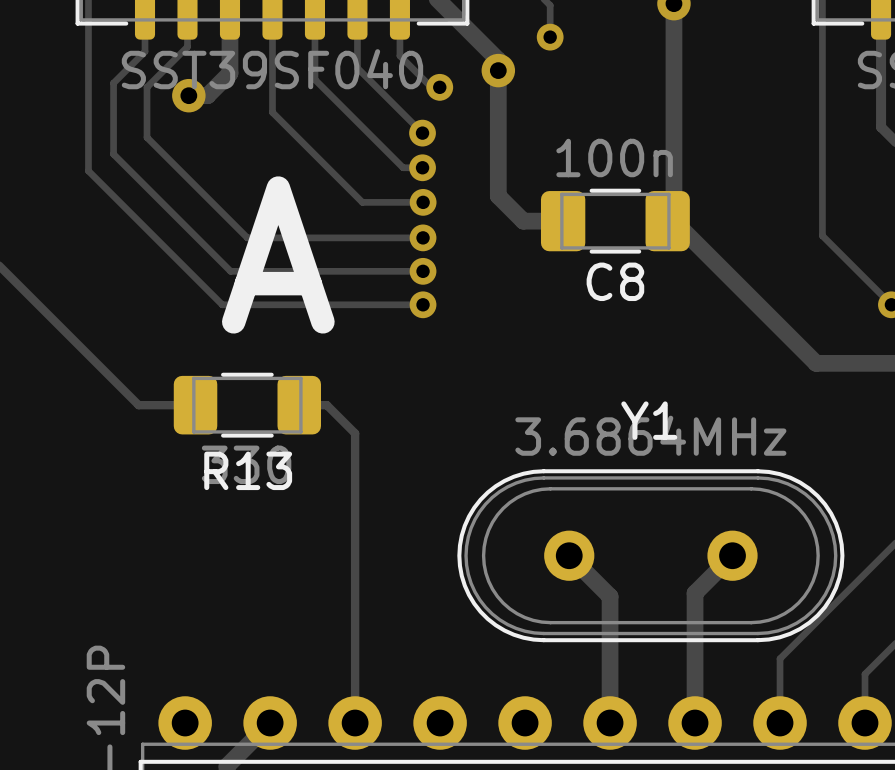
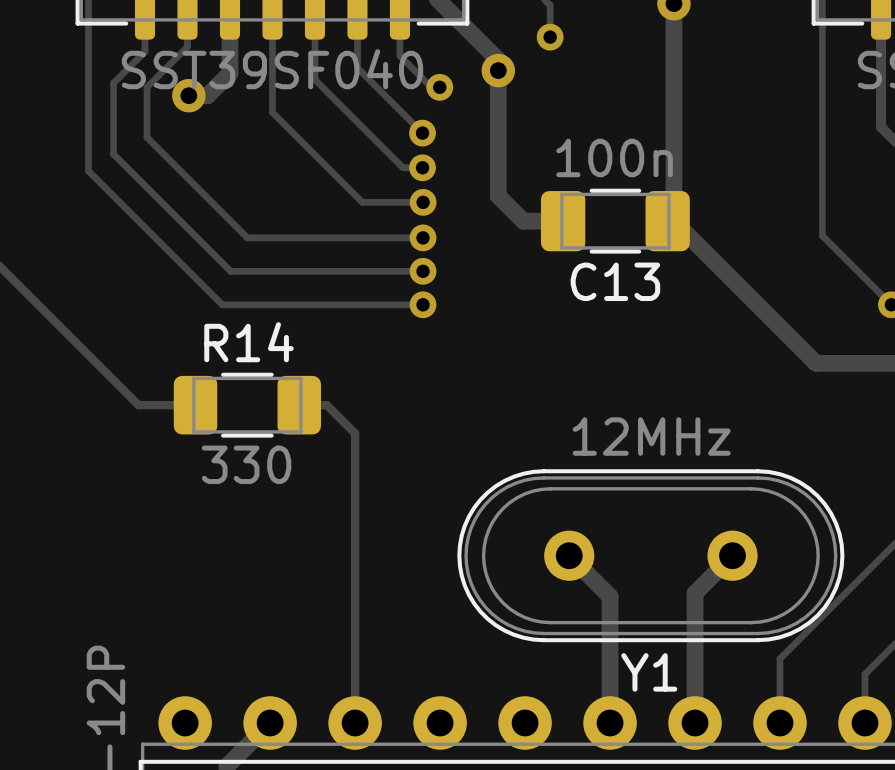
text: A (278, 254) -> none
C8 name: C8 (615, 281) -> C13 (615, 281)
Y1 name position: Y1 (649, 420) -> Y1 (649, 672)
Y1 value: 3.6864MHz (650, 435) -> 12MHz (651, 436)
R13 name: R13 (248, 470) -> R14 (248, 342)

